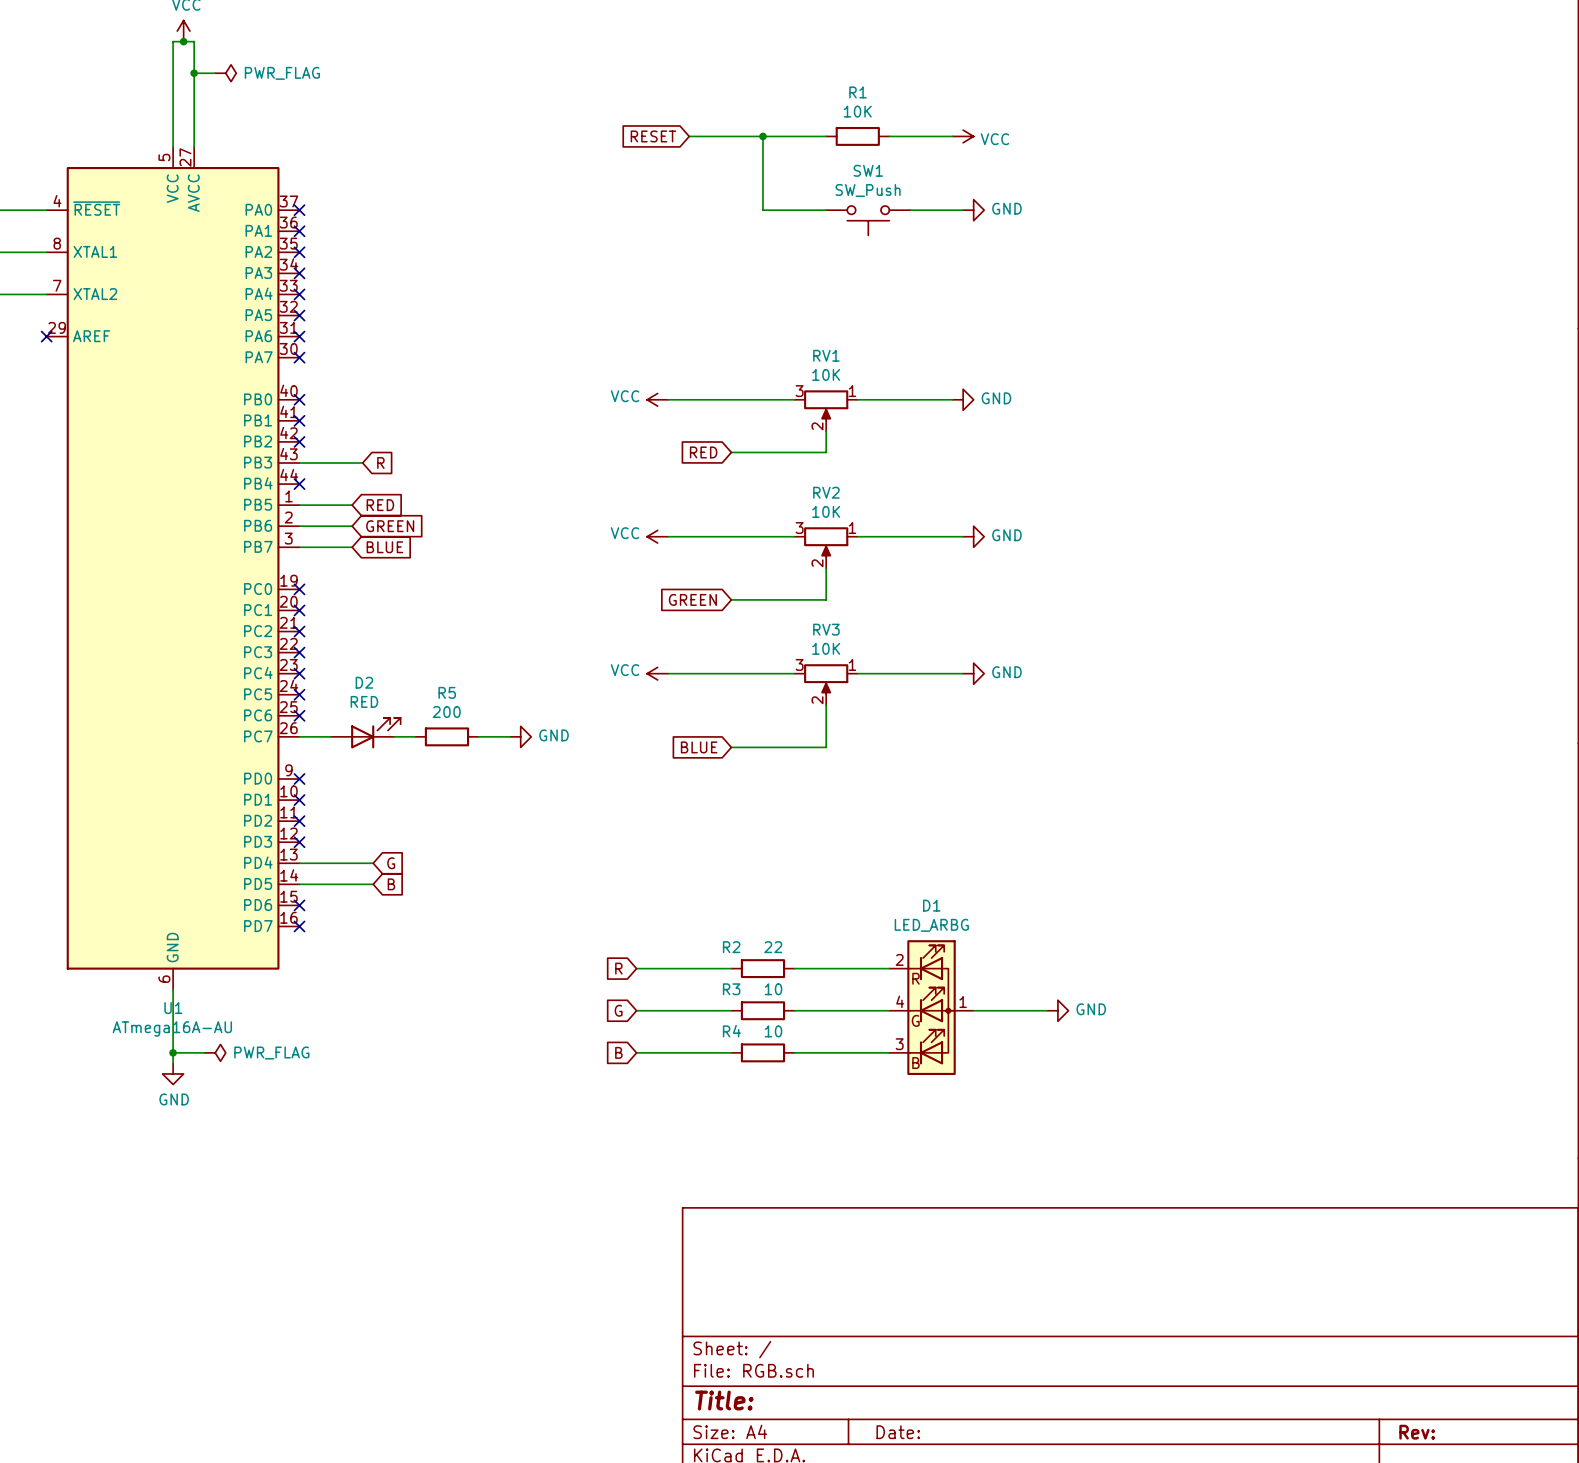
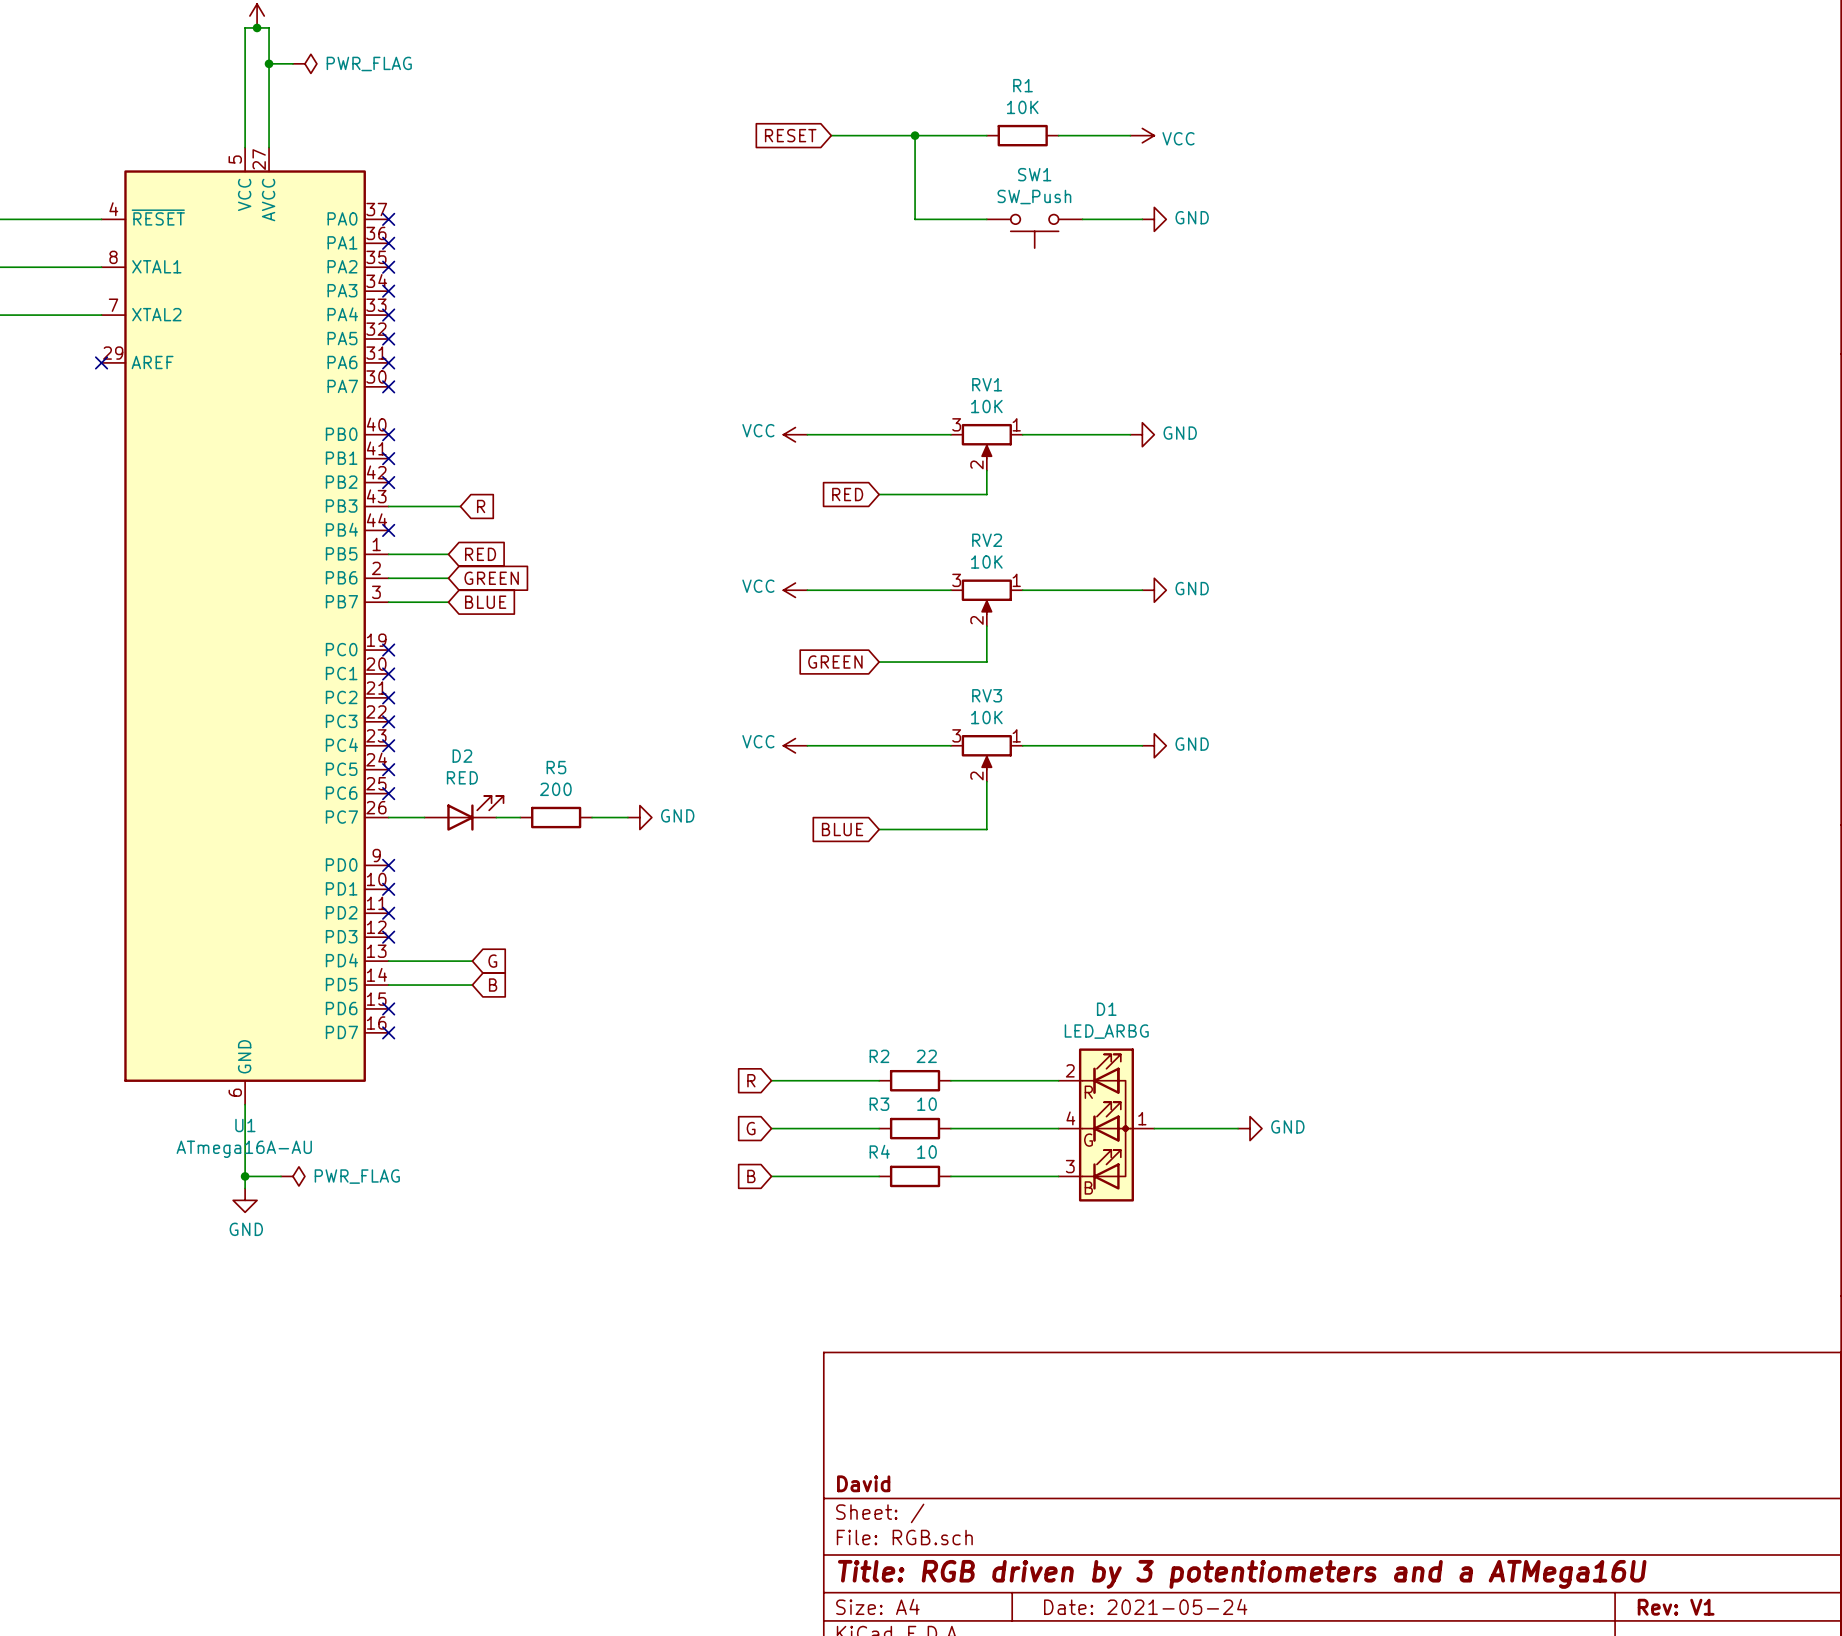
title block: none -> David (863, 1483)
title block: Title: (724, 1400) -> Title: RGB driven by 3 potentiometers and a ATMega16U (1242, 1574)
title block: Date: (898, 1432) -> Date: 2021-05-24 (1145, 1606)
title block: Rev: (1417, 1432) -> Rev: V1 (1676, 1607)

